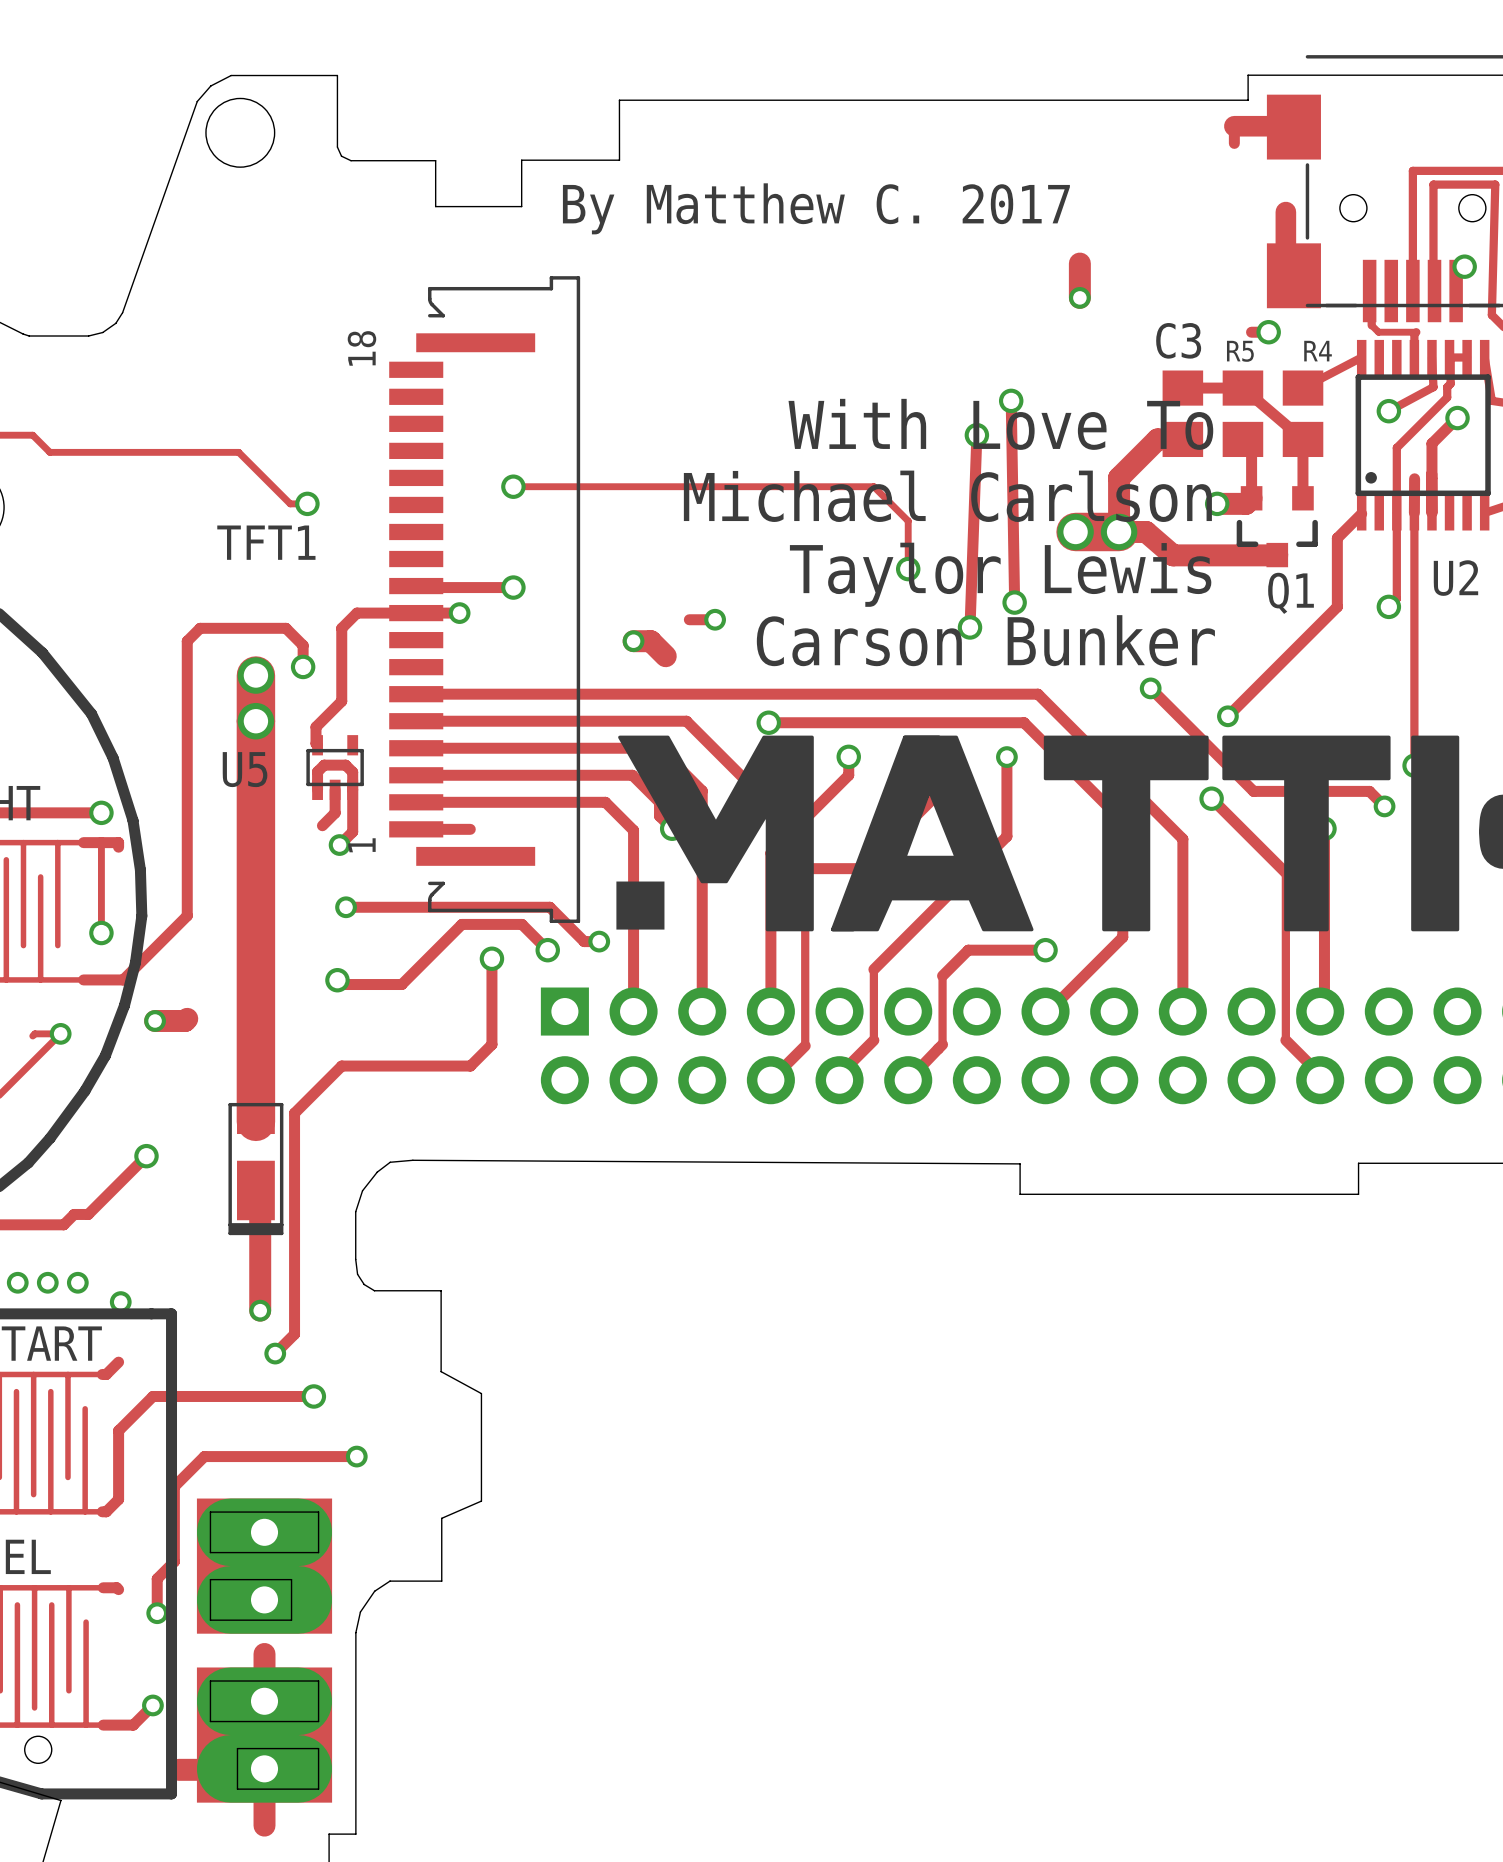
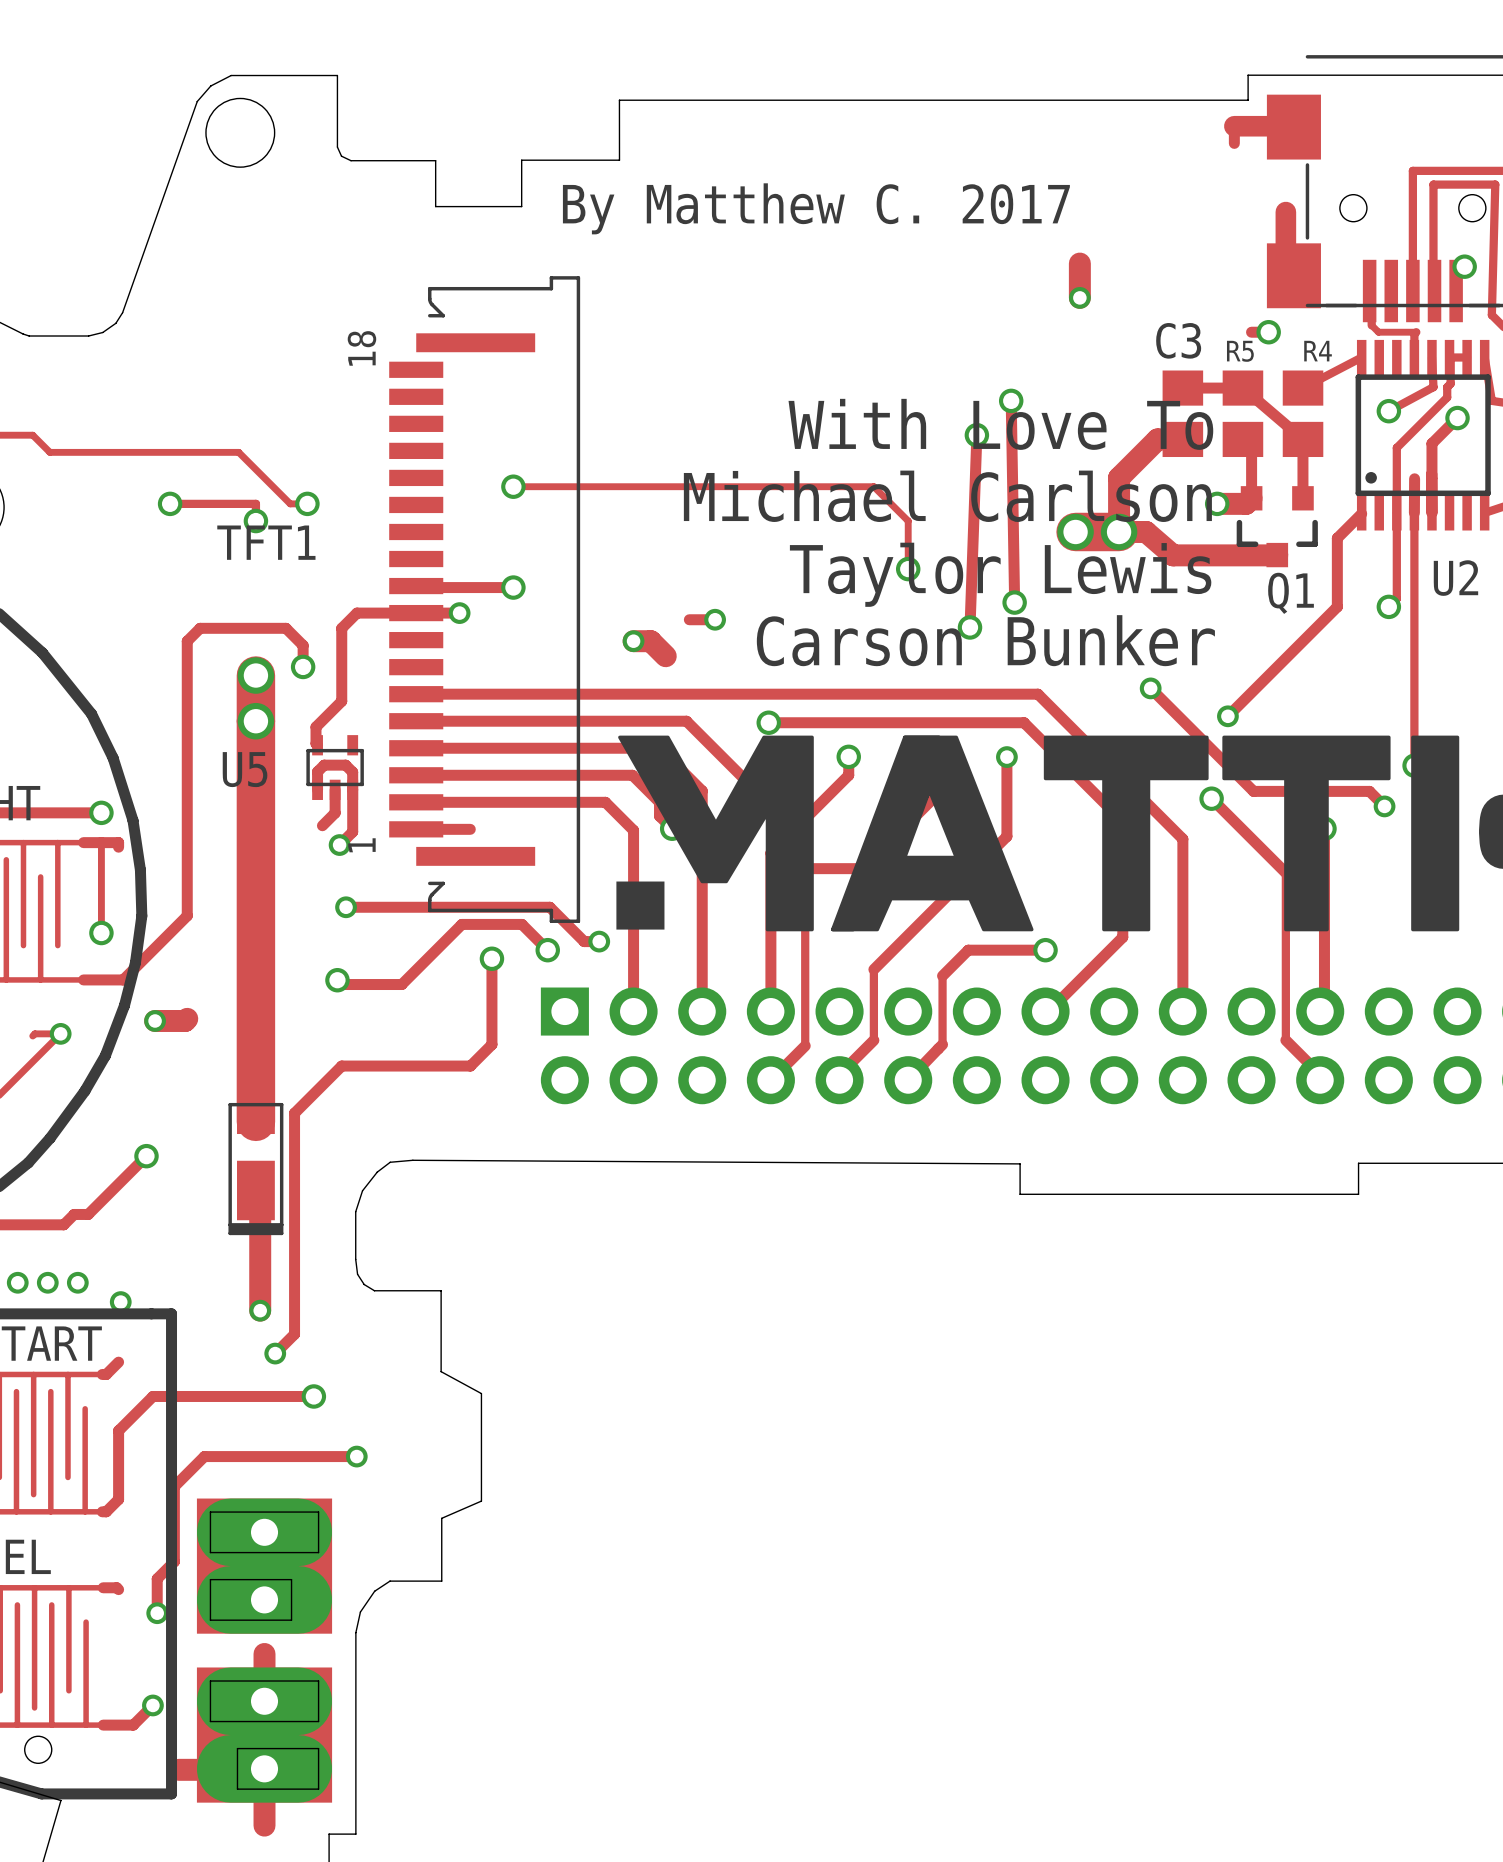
track: none -> (170, 503) (255, 503) (255, 521)
via: none -> (170, 503)
via: none -> (255, 521)

